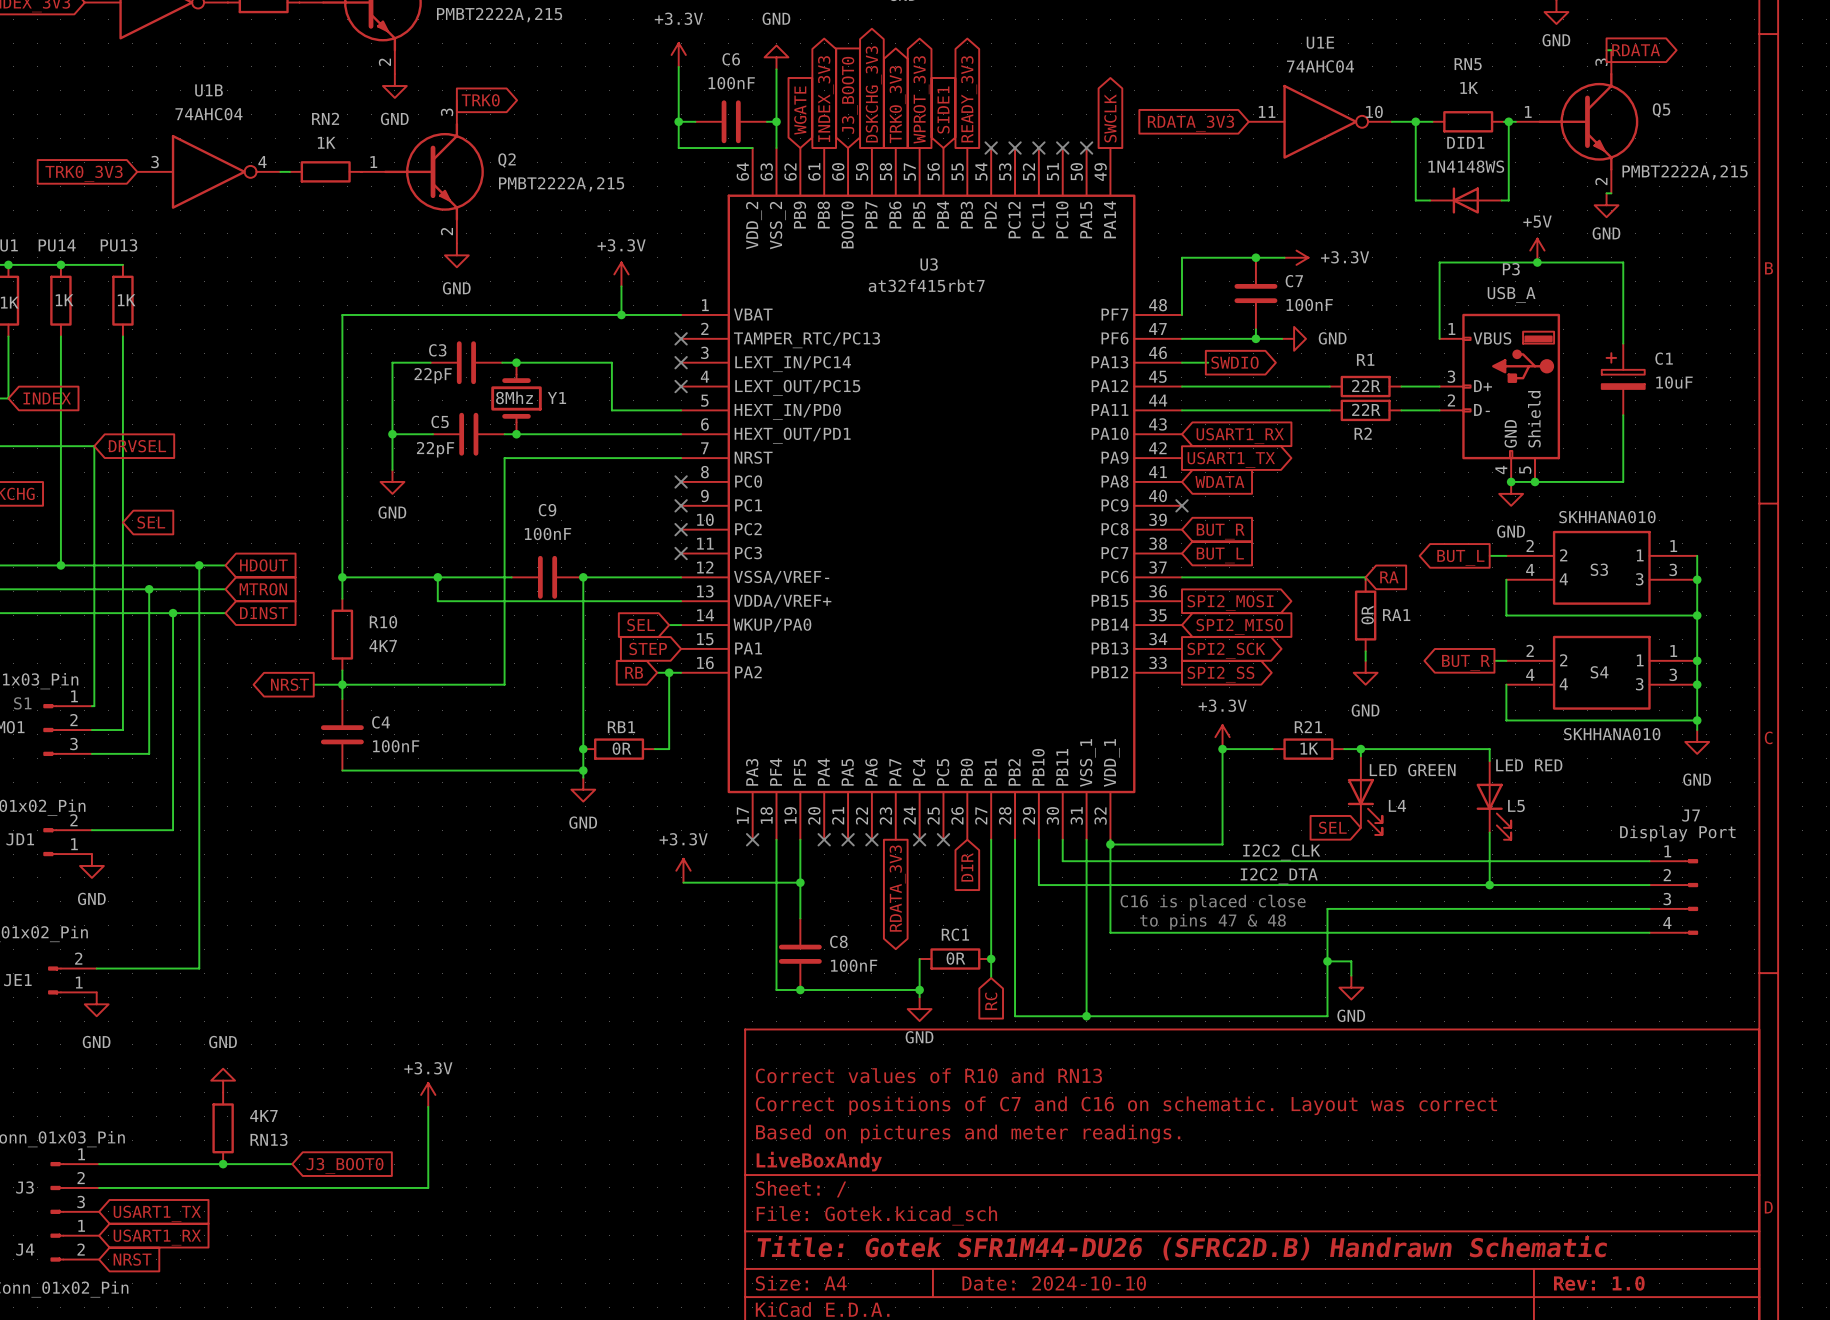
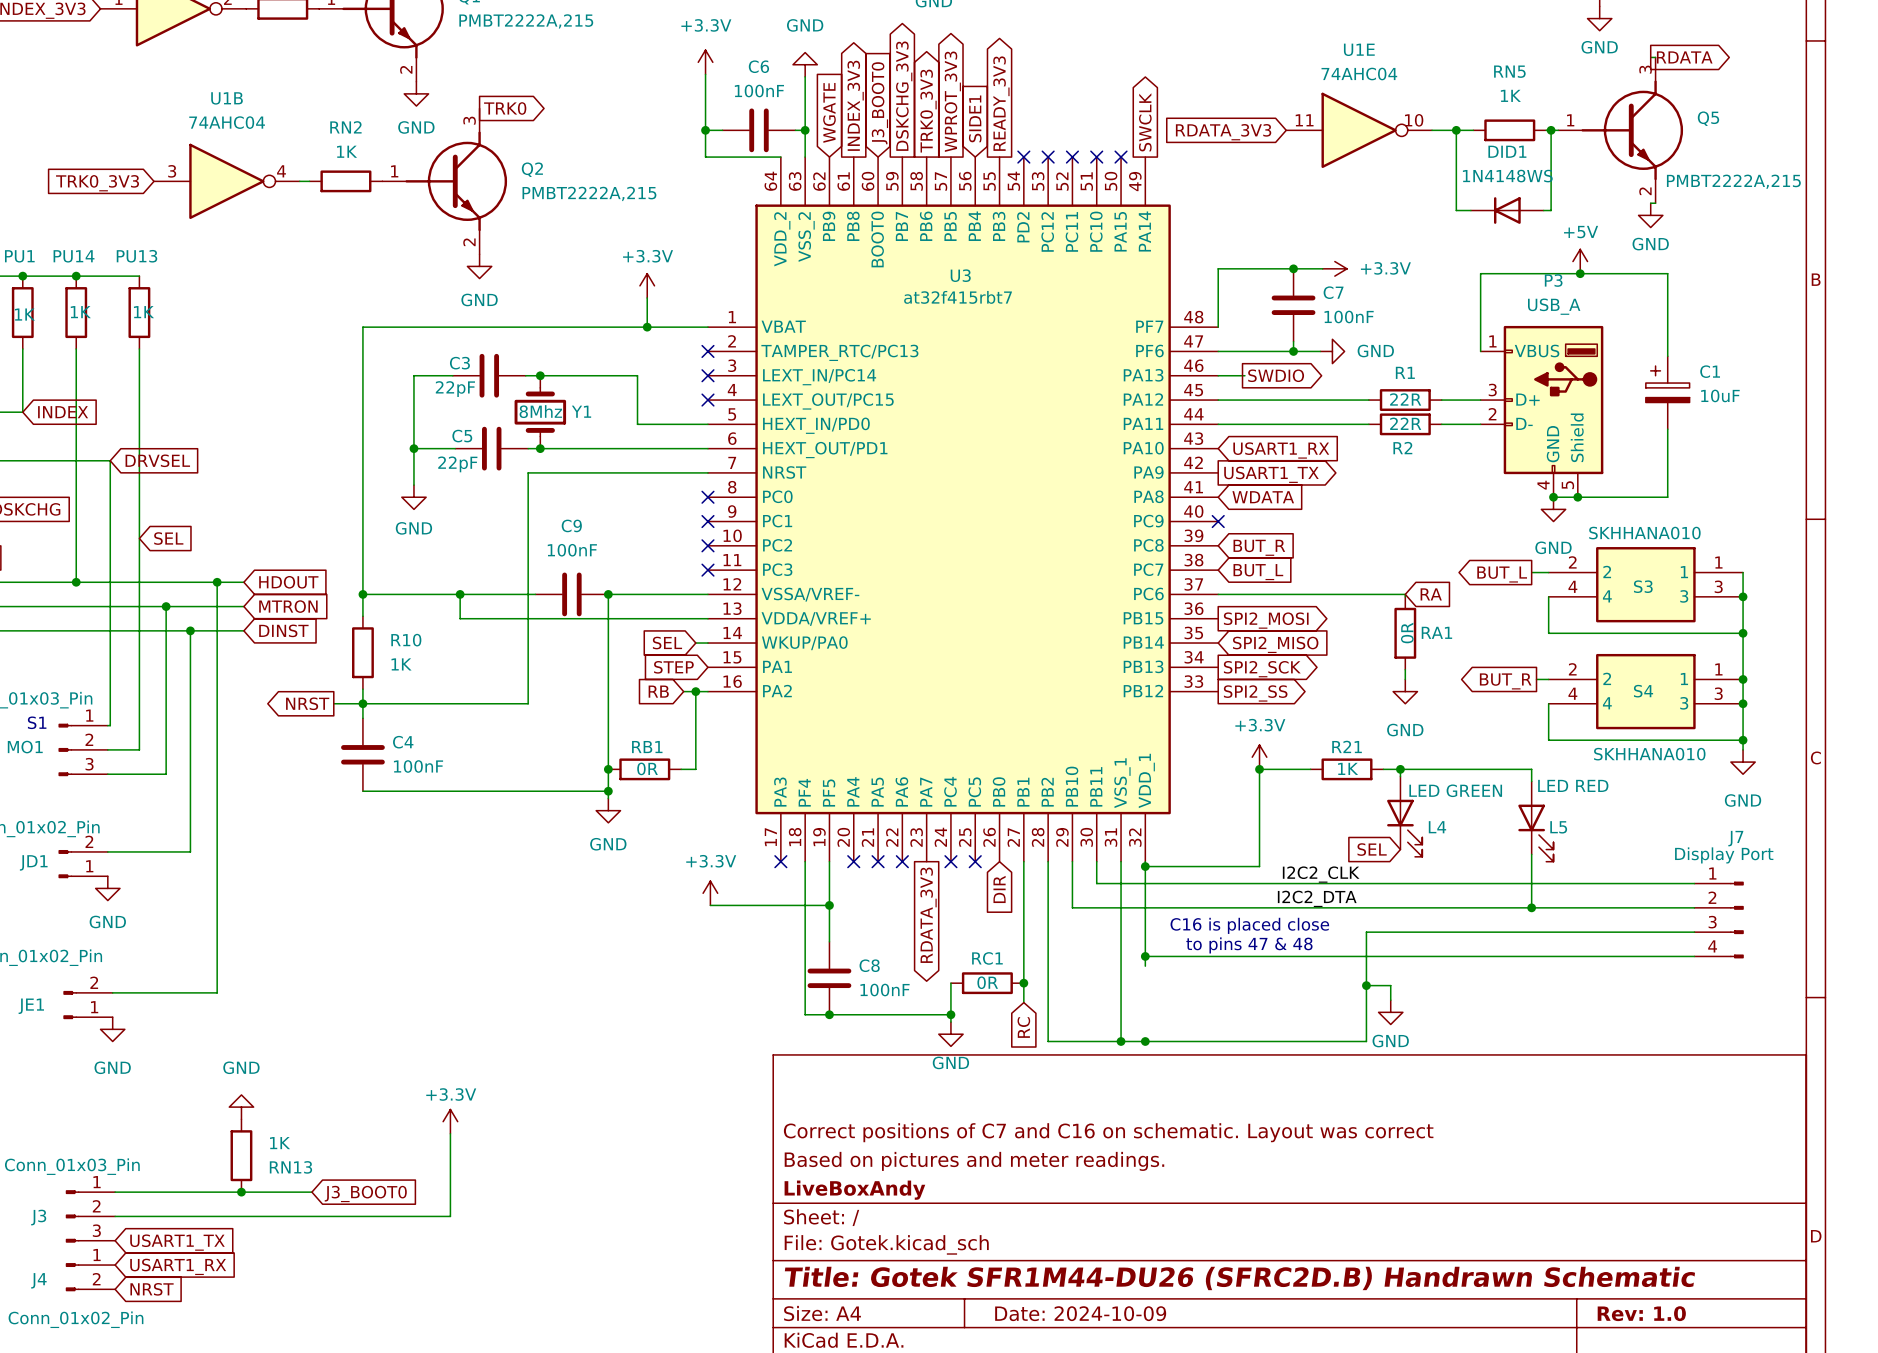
R10 value: 4K7 (383, 646) -> 1K (401, 664)
wire: none -> (1145, 956) (1145, 966)
junction: none -> (1145, 956)
junction: none -> (1145, 1041)
title block: Correct values of R10 and RN13 (928, 1075) -> none
RN13 value: 4K7 (263, 1115) -> 1K (280, 1143)
title block: Date: 2024-10-10 (1054, 1283) -> Date: 2024-10-09 (1080, 1313)

